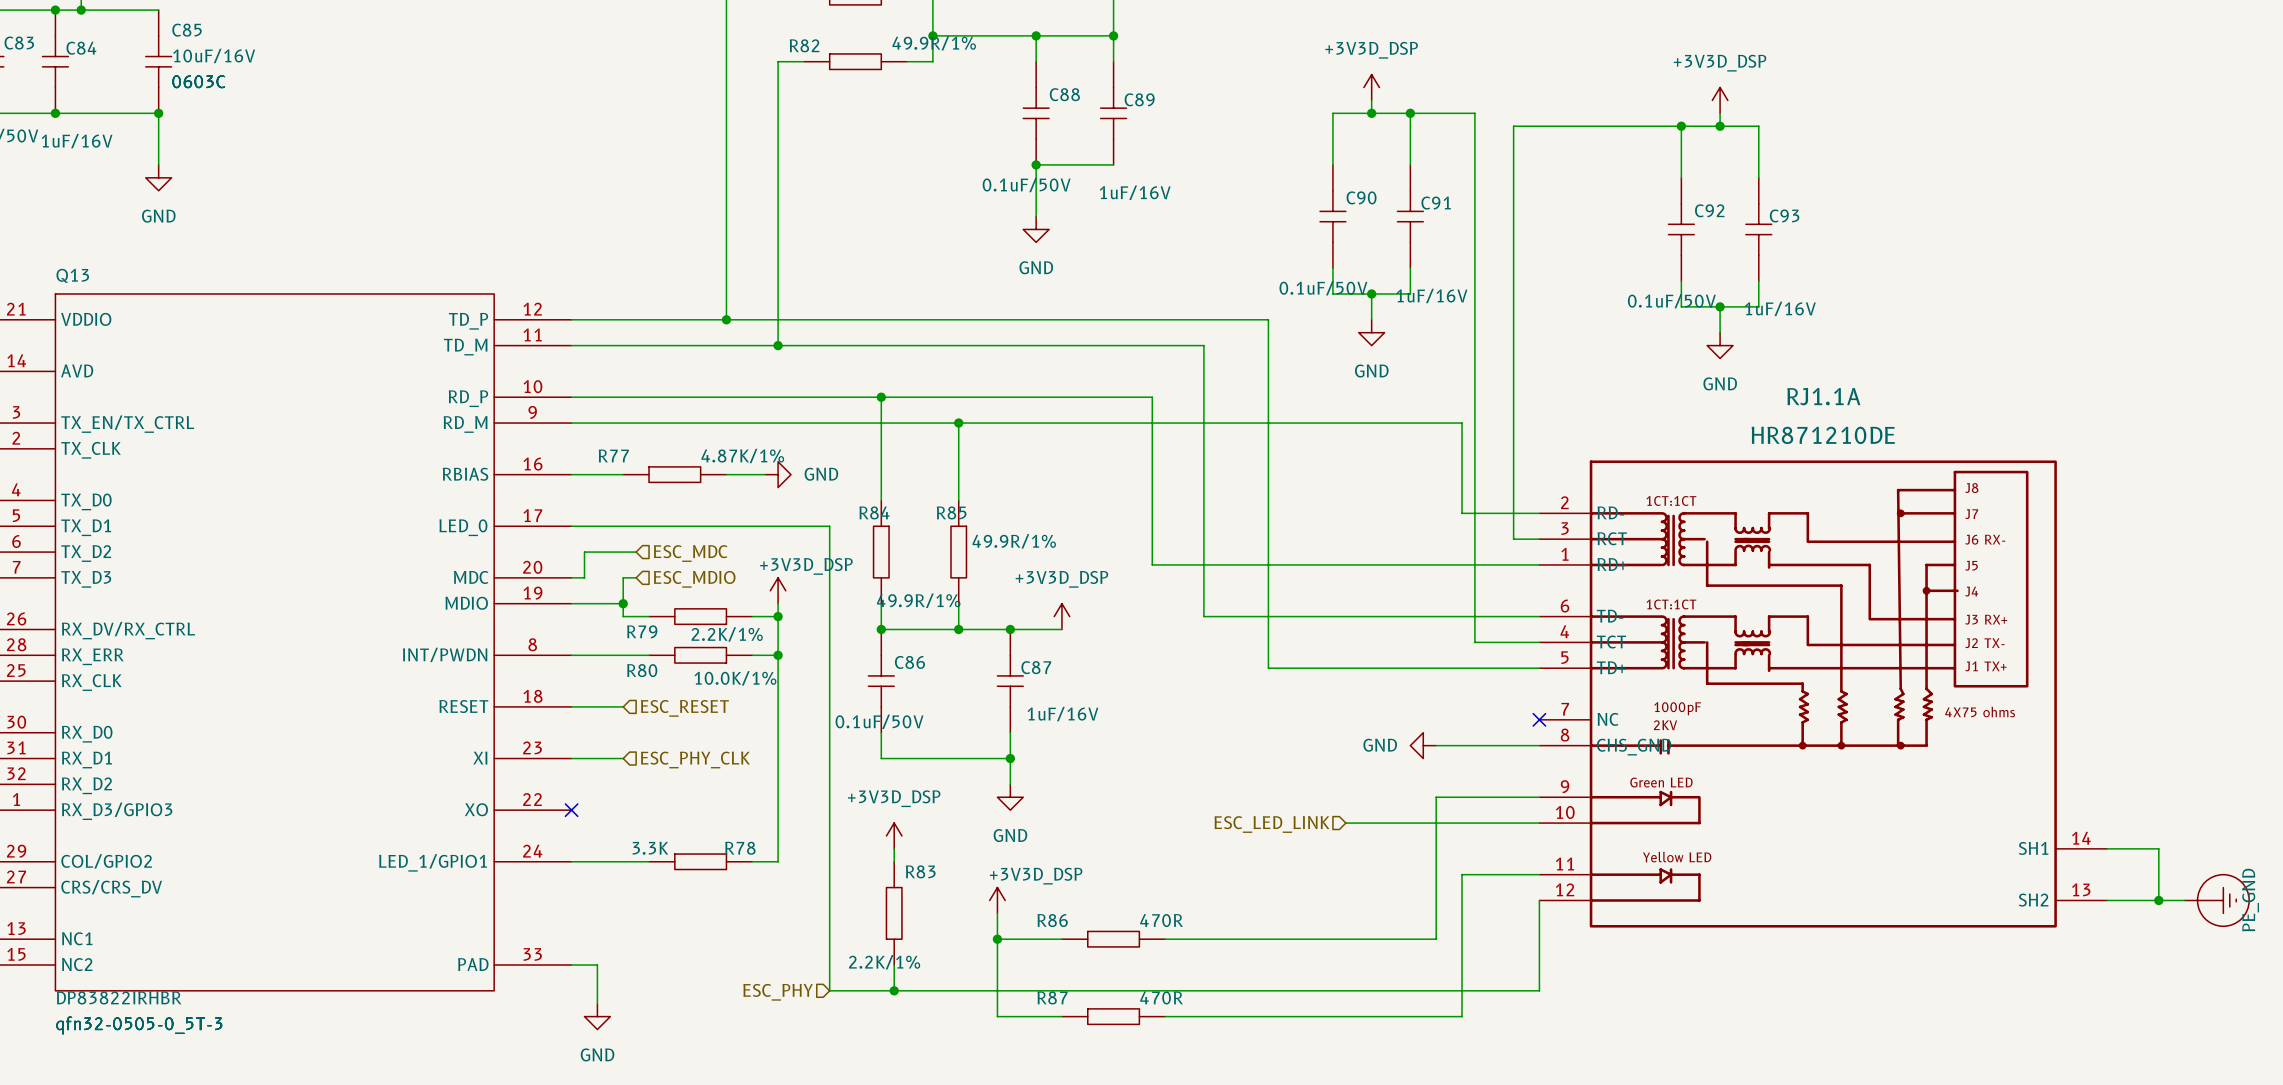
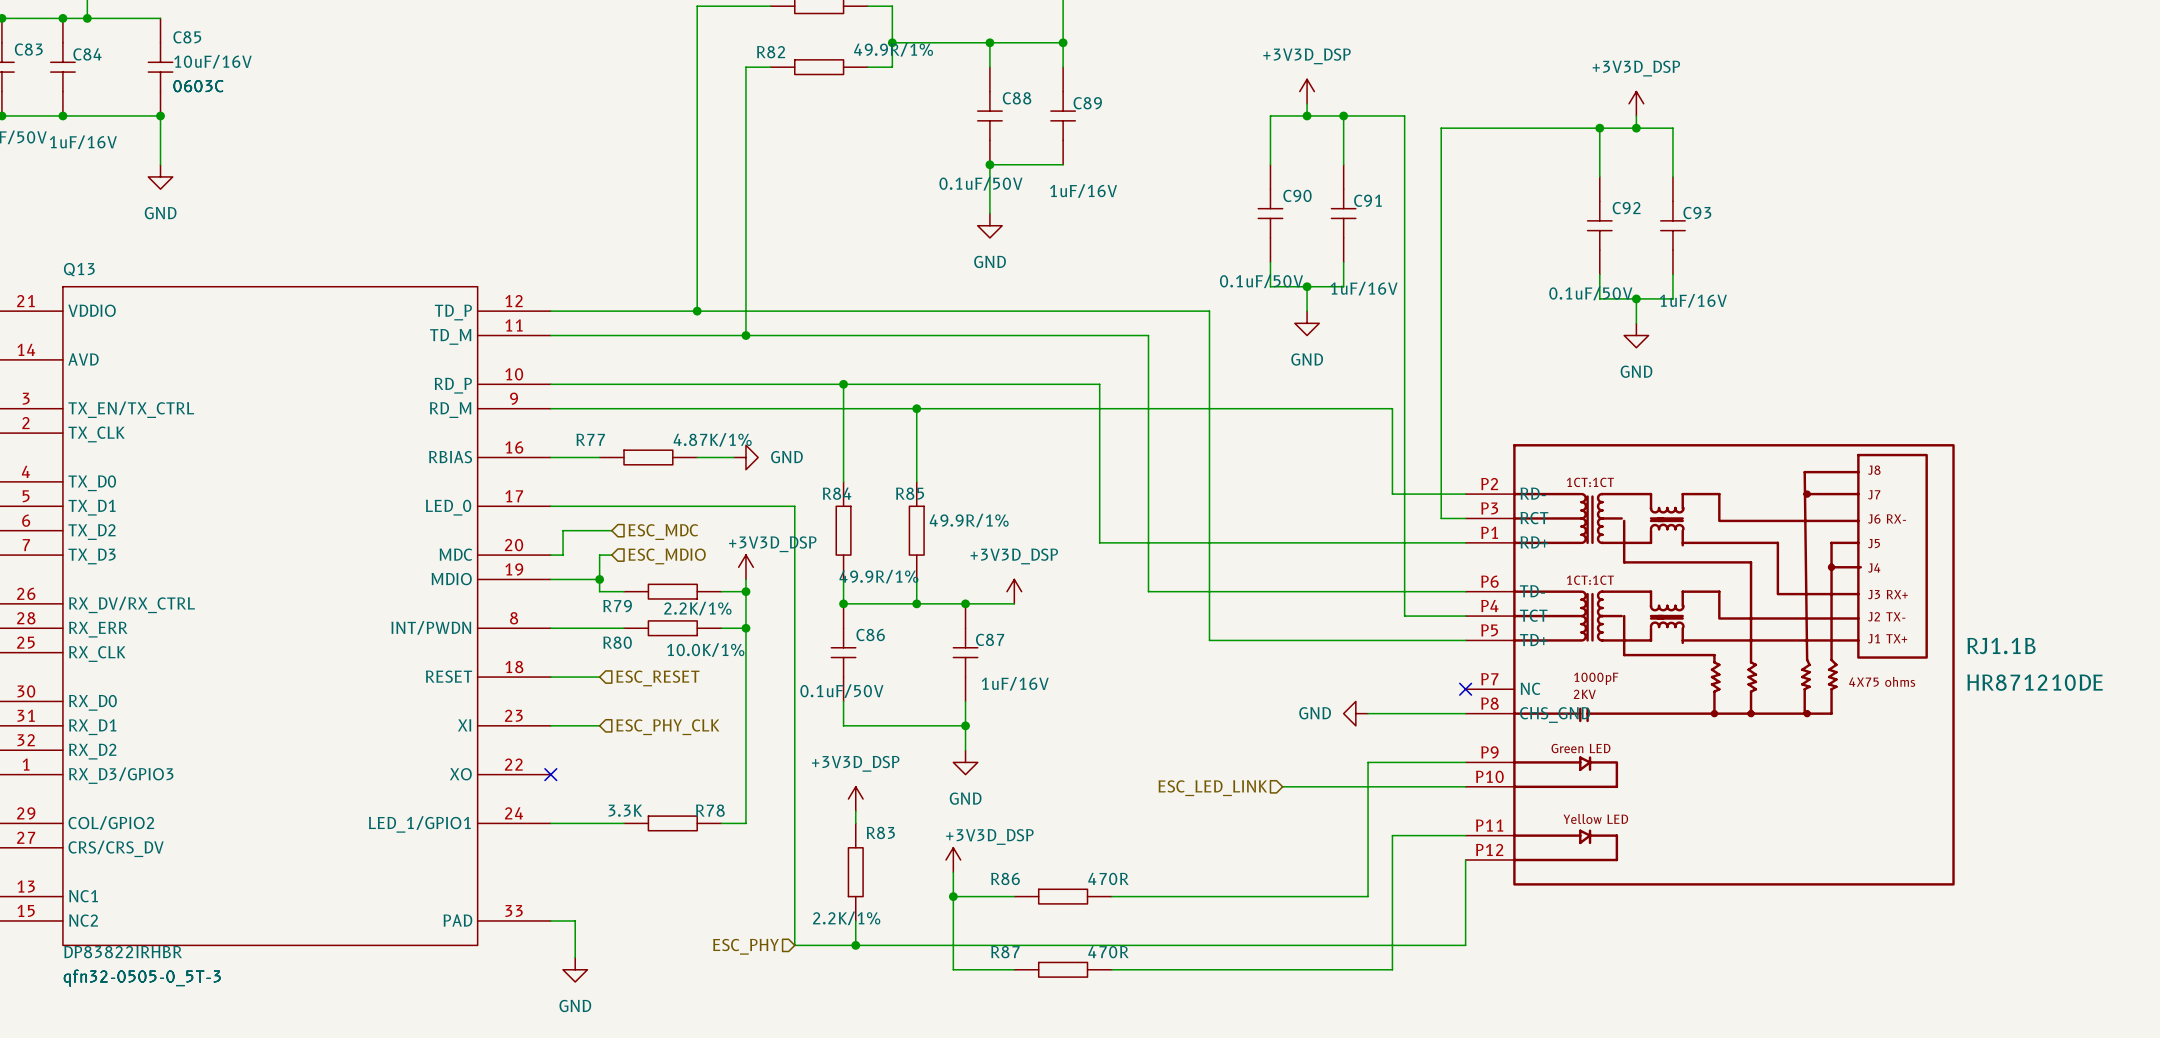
RJ1.1B: none -> HR871210DE (1710, 664)
RJ1.1A: HR871210DE (1823, 694) -> none
wire: (2107, 848) (2158, 848) (2158, 900) -> none
wire: (2107, 900) (2184, 900) -> none
junction: (2158, 900) -> none
power symbol: PE_GND (2216, 900) -> none

